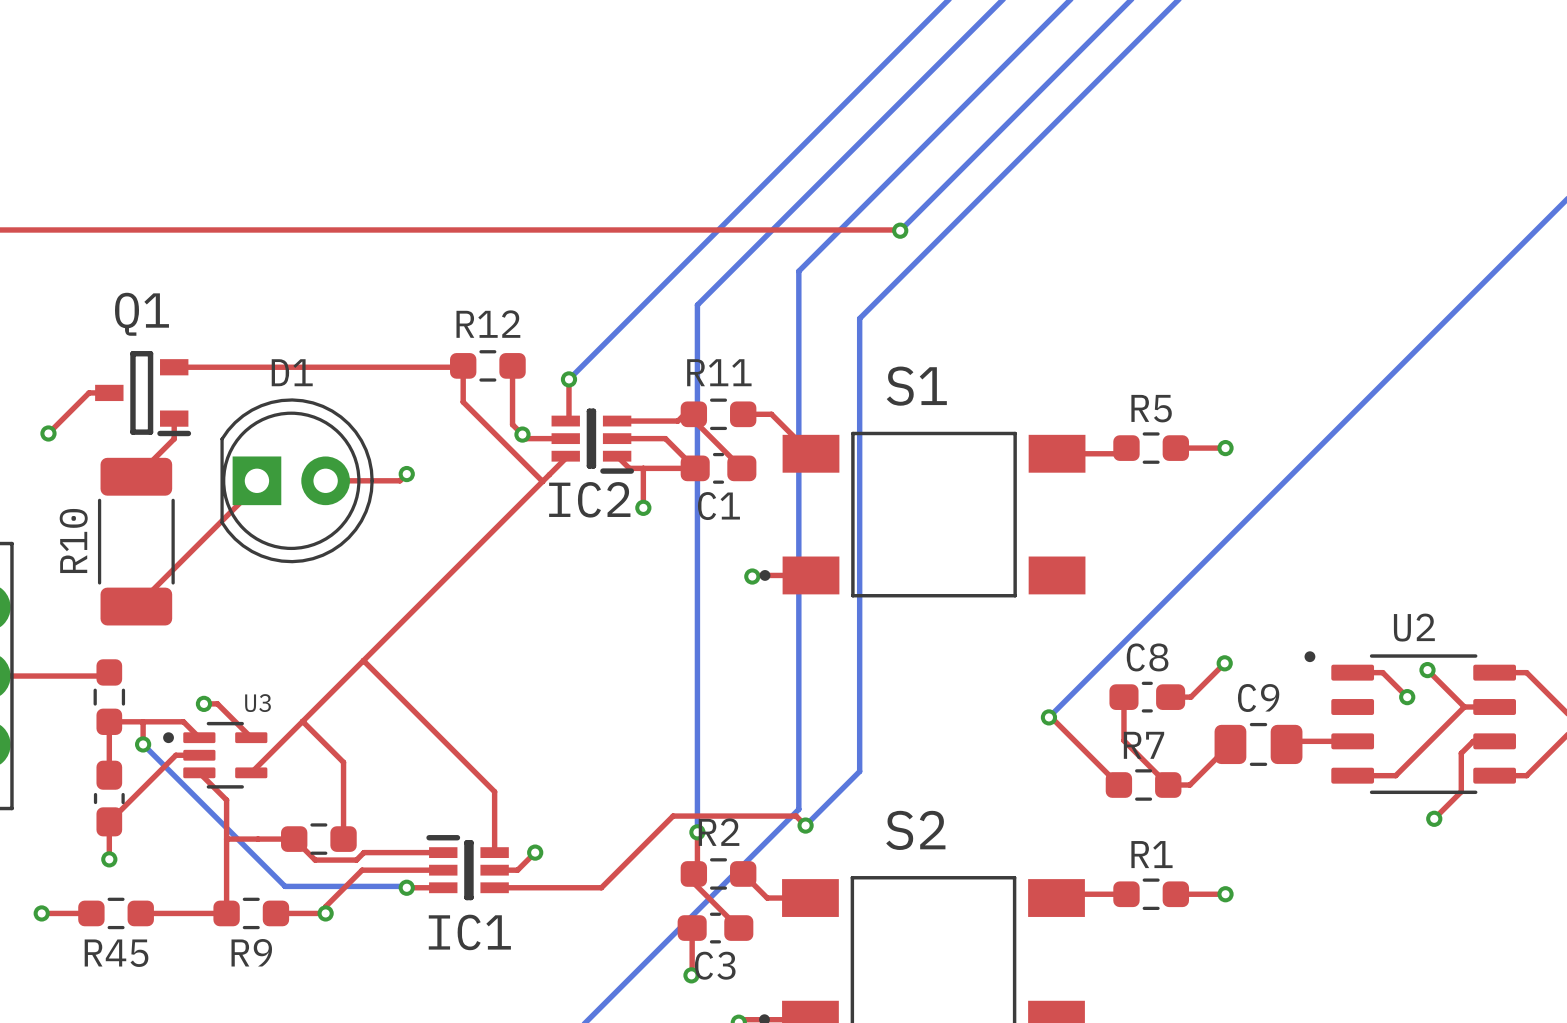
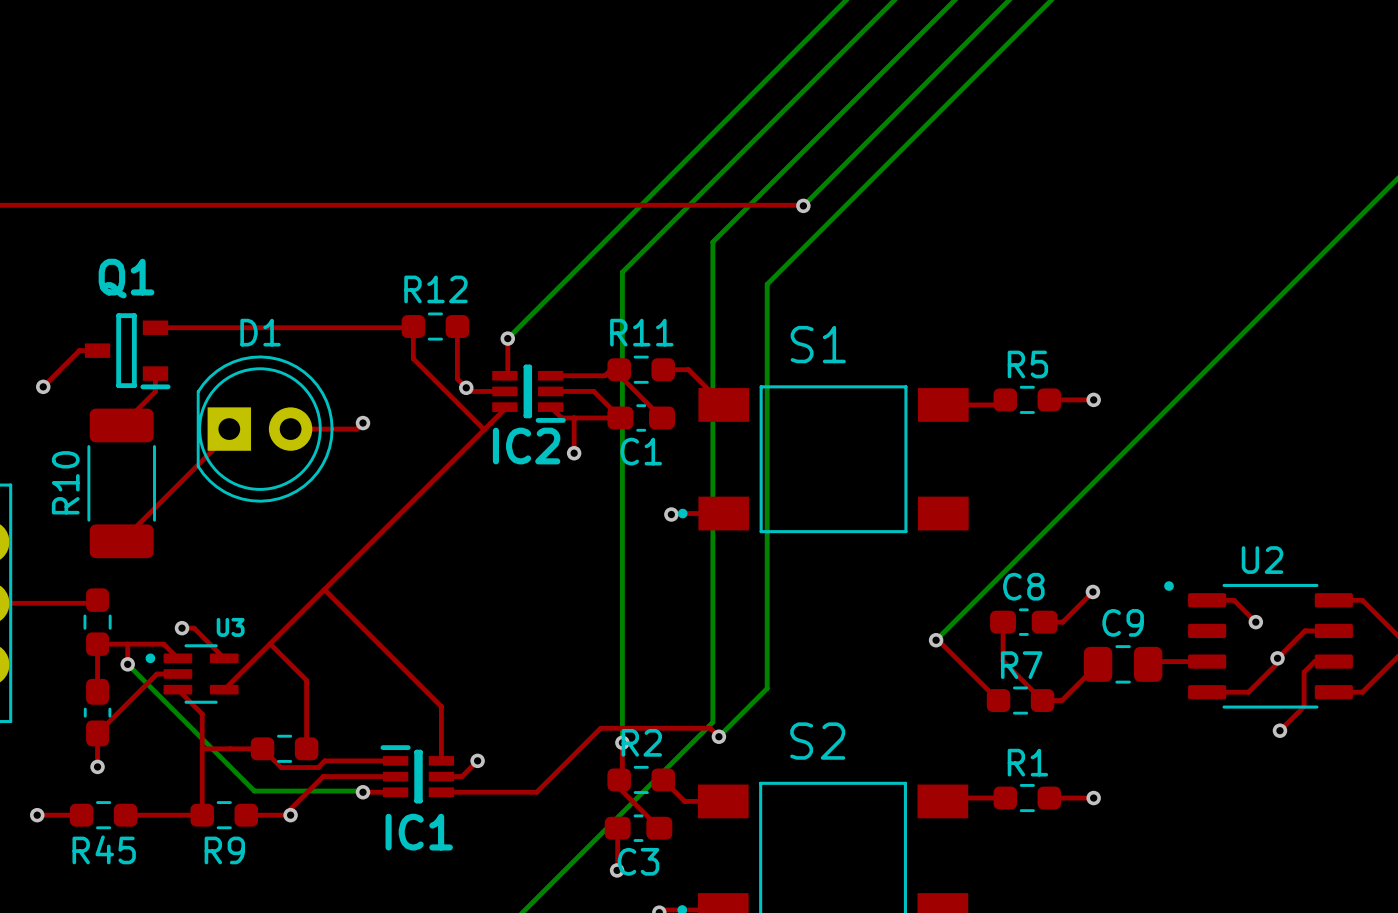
top track: (1427, 670) (1464, 706) (1395, 775) -> (1306, 630) (1277, 658) (1277, 663) (1248, 692) (1245, 692)
via position: (1427, 670) -> (1277, 658)

